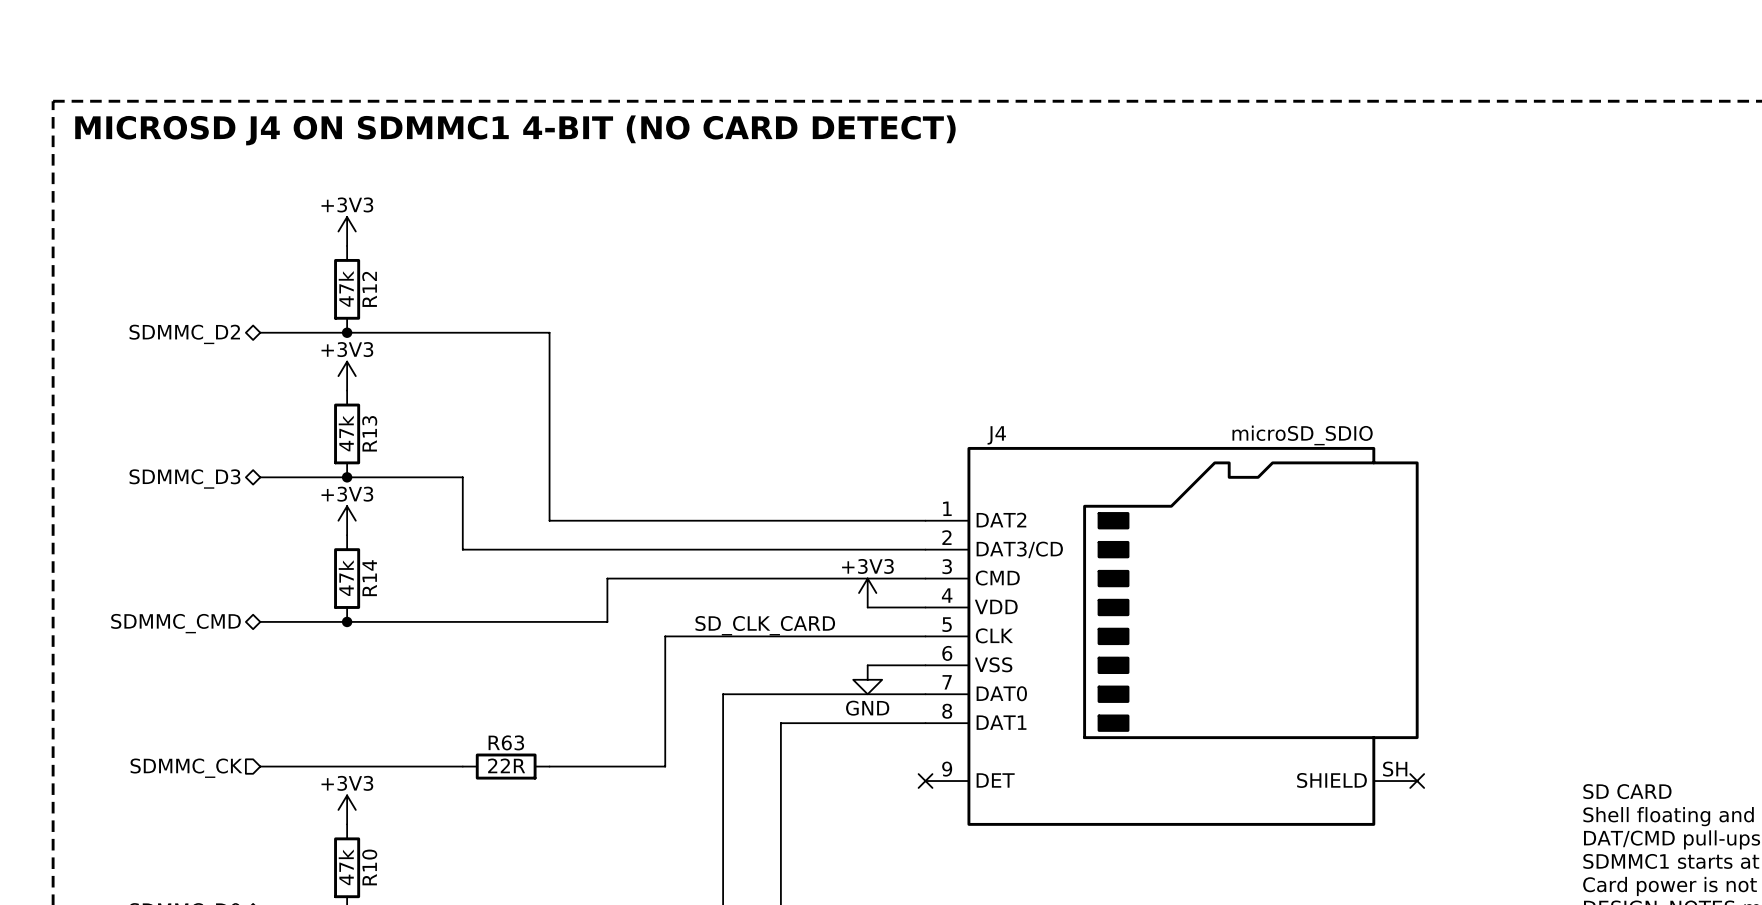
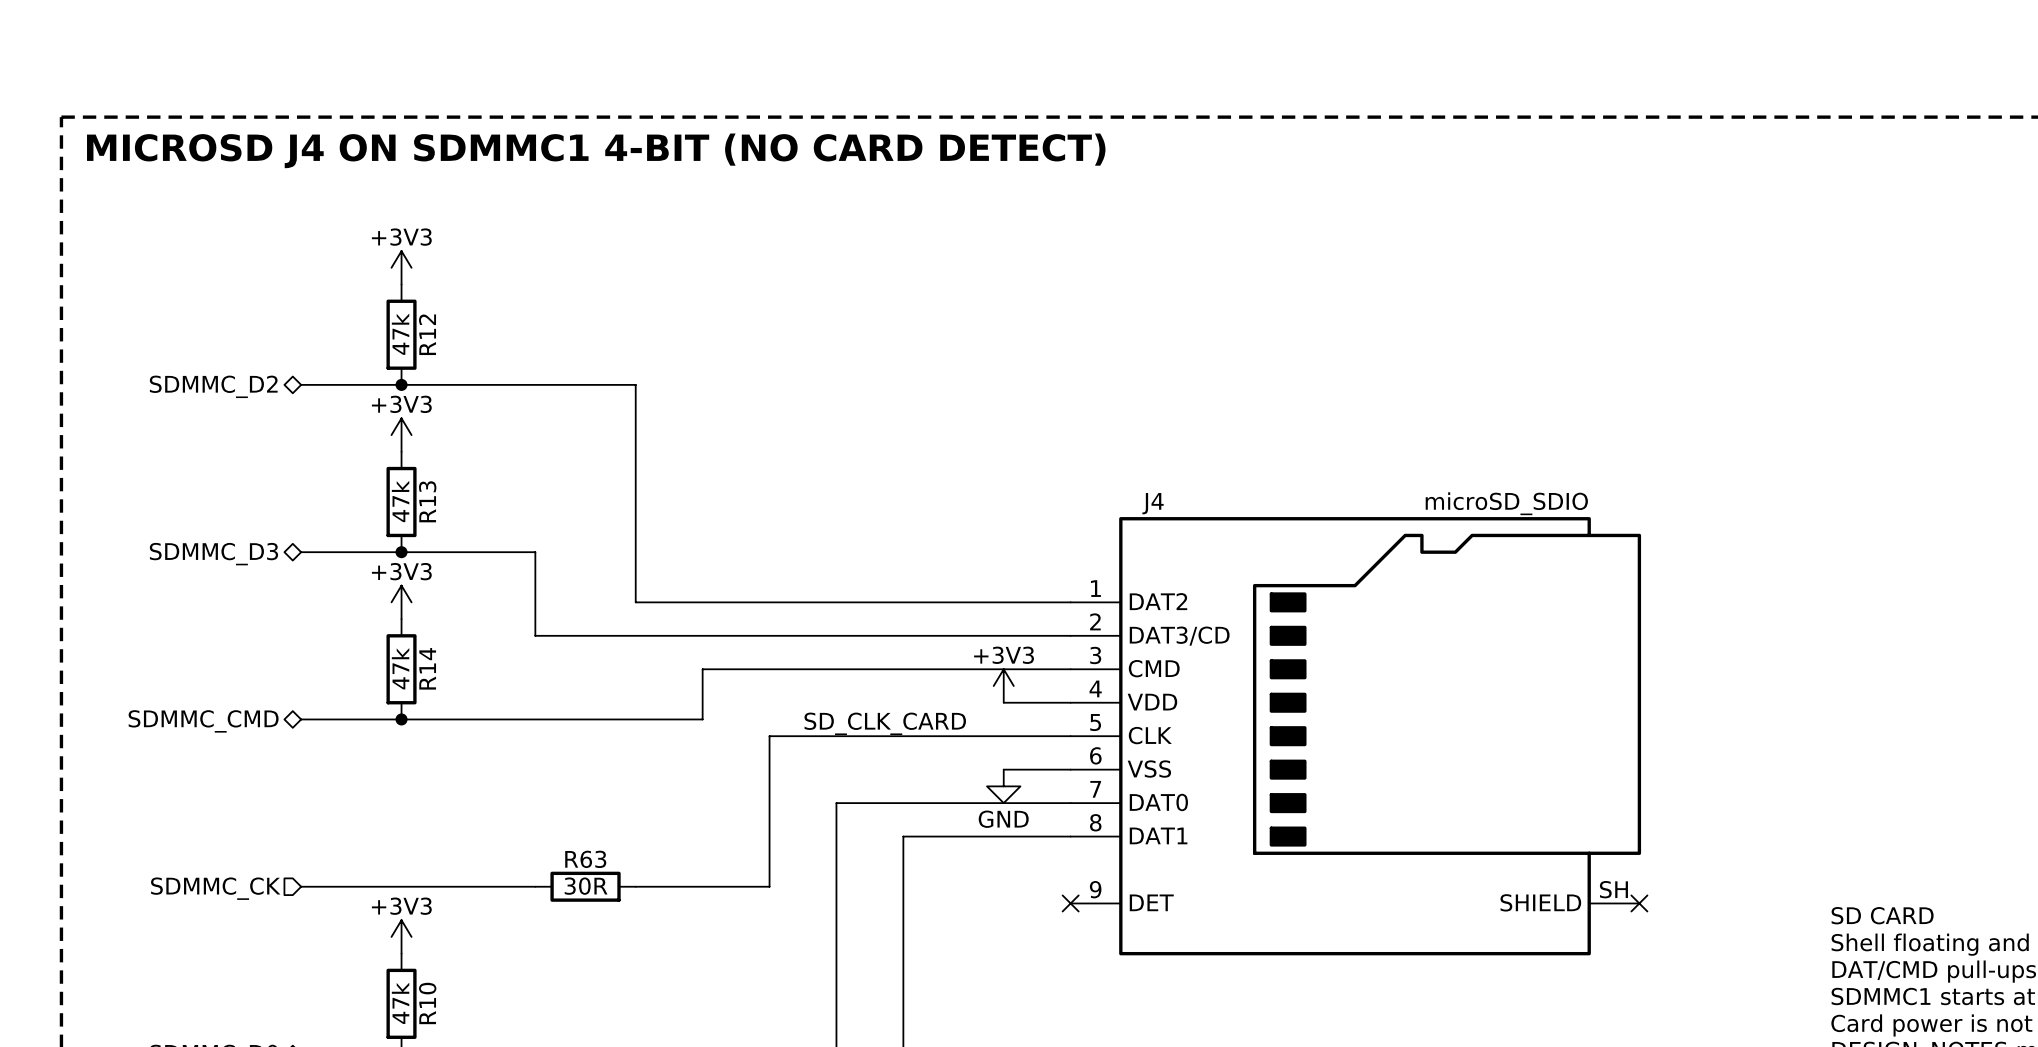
R63 value: 22R (506, 765) -> 30R (586, 886)

